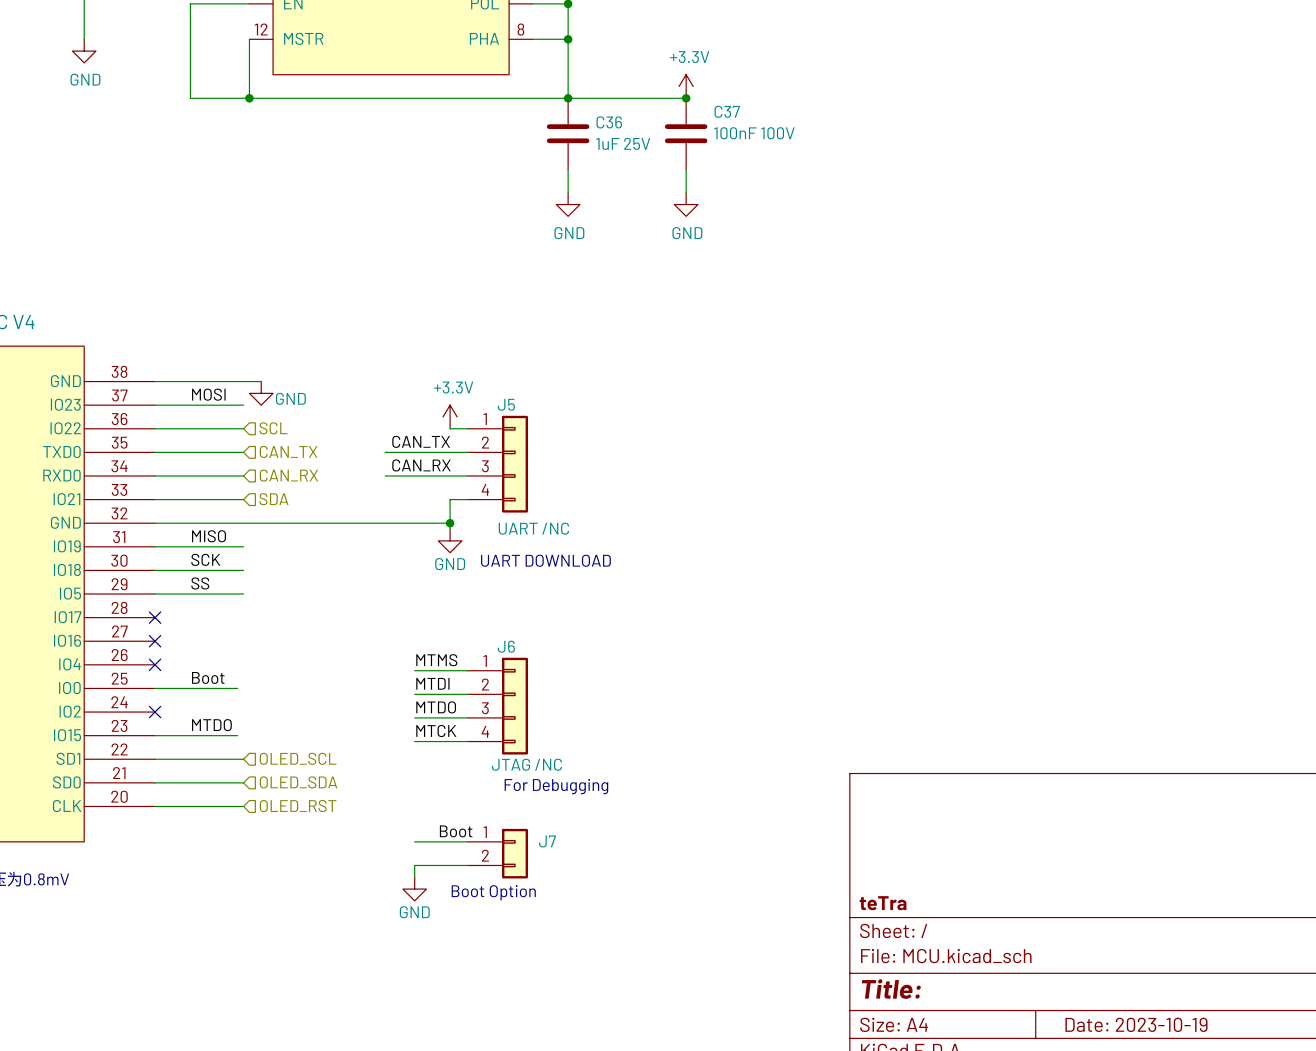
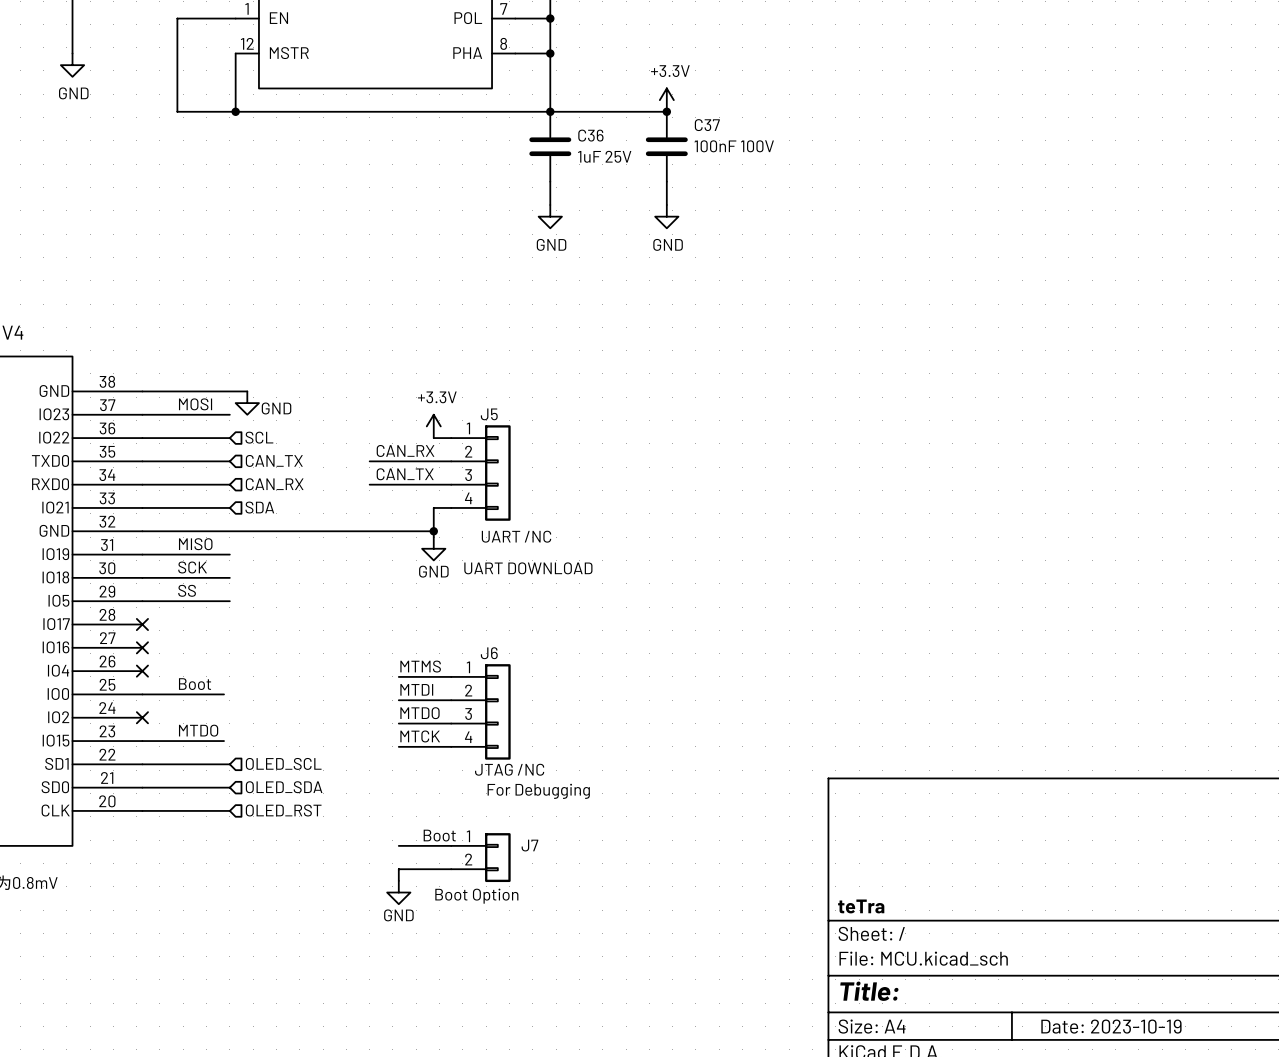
label: CAN_TX (421, 441) -> CAN_RX (405, 450)
label: CAN_RX (421, 465) -> CAN_TX (405, 474)

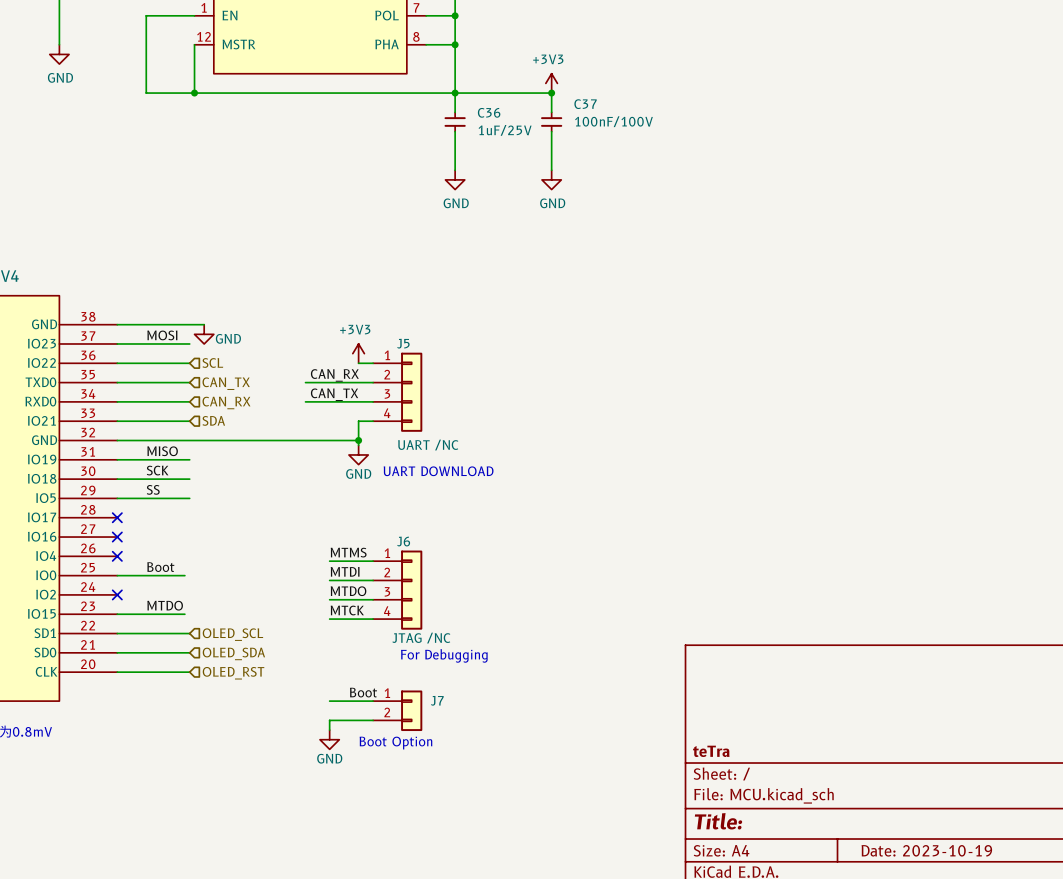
power symbol: +3.3V (666, 100) -> +3V3 (551, 83)
C36 symbol: [529, 111, 572, 182] -> [444, 112, 466, 132]
C37 symbol: [645, 111, 688, 182] -> [541, 112, 563, 132]
C37 value: 100nF 100V (734, 146) -> 100nF/100V (613, 121)
C36 value: 1uF 25V (604, 156) -> 1uF/25V (505, 130)
power symbol: +3.3V (433, 426) -> +3V3 (358, 353)

